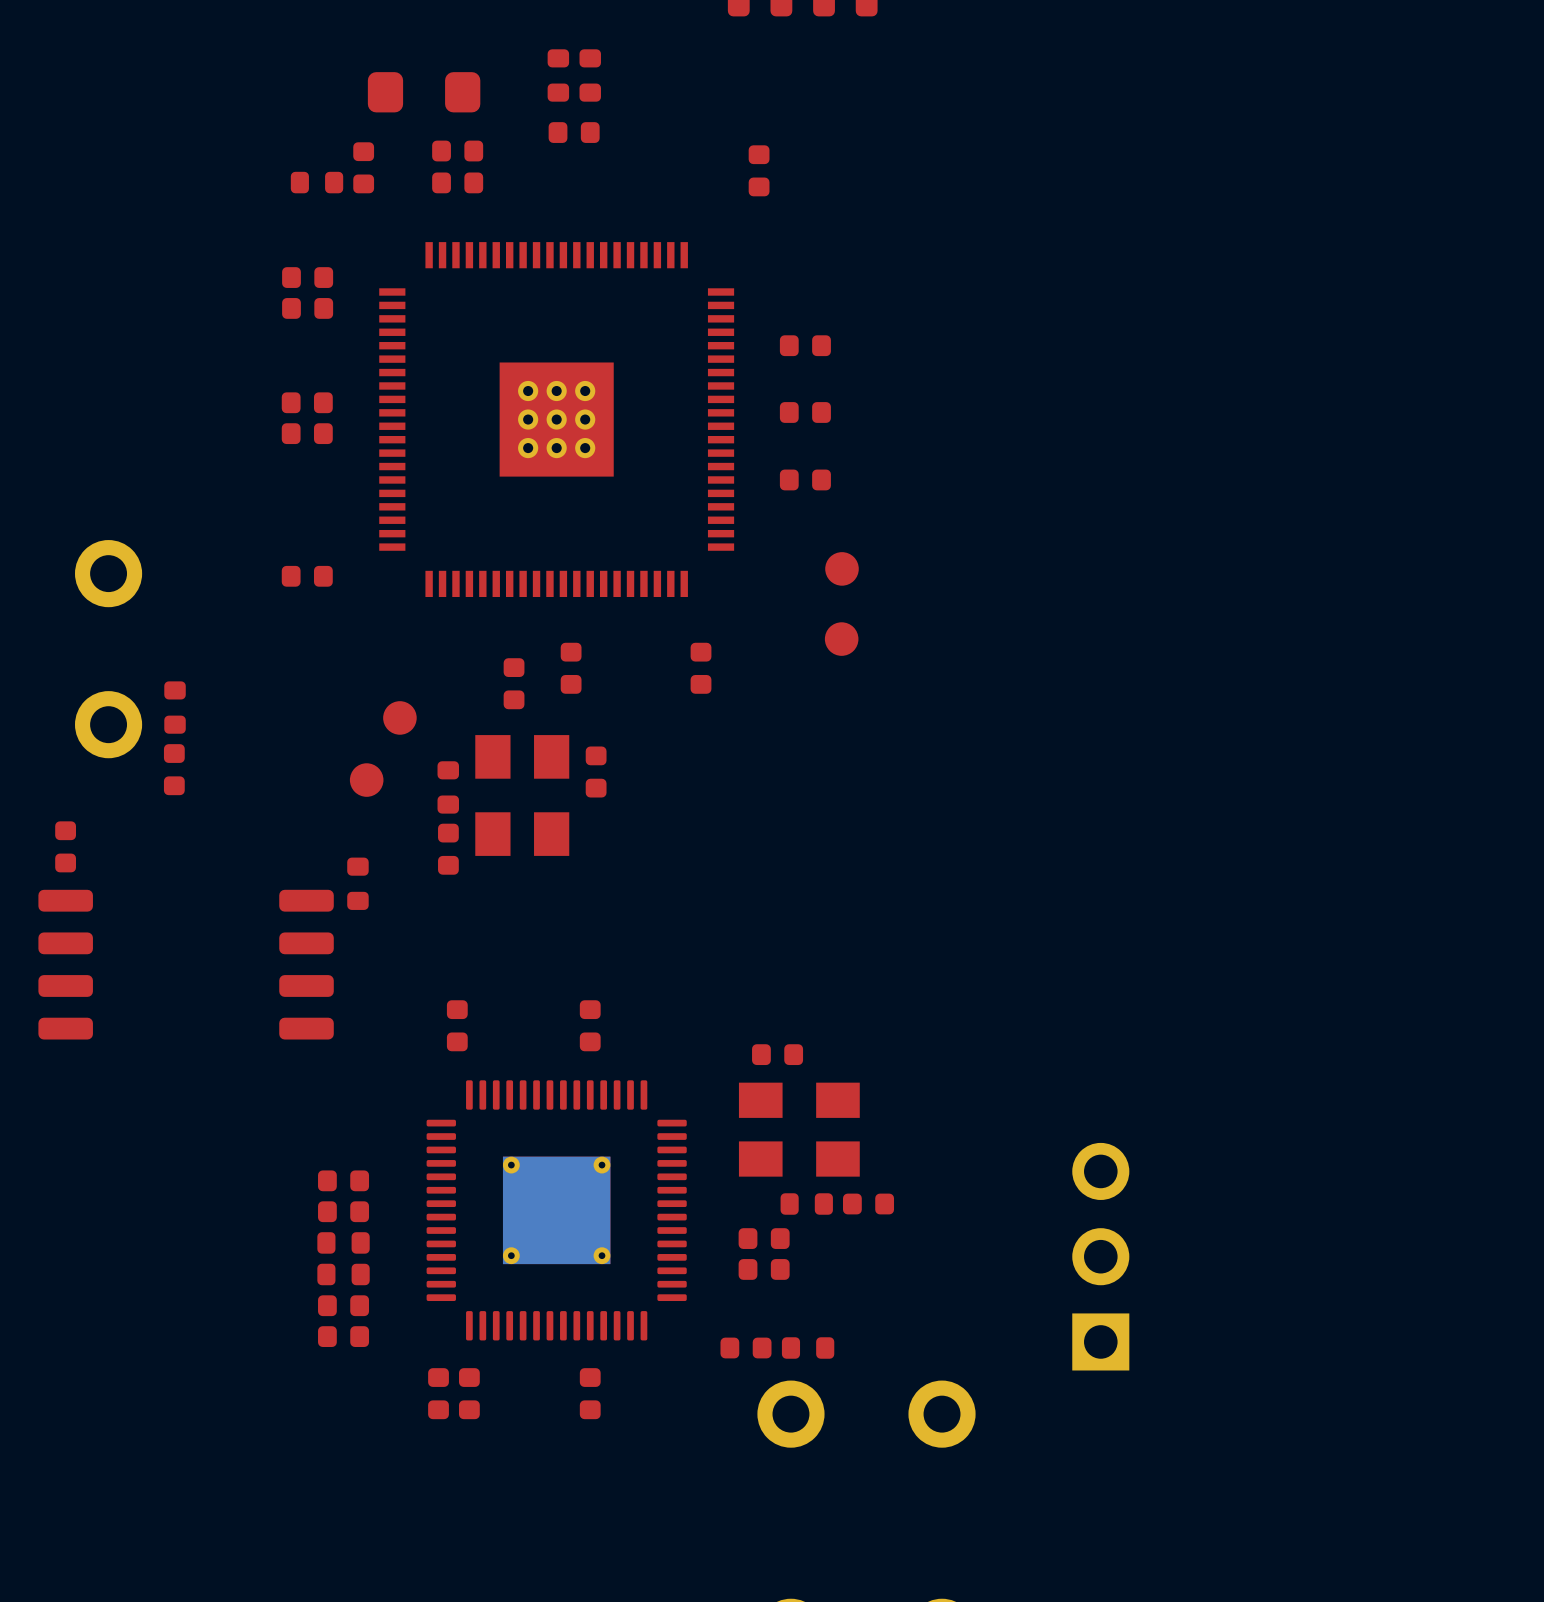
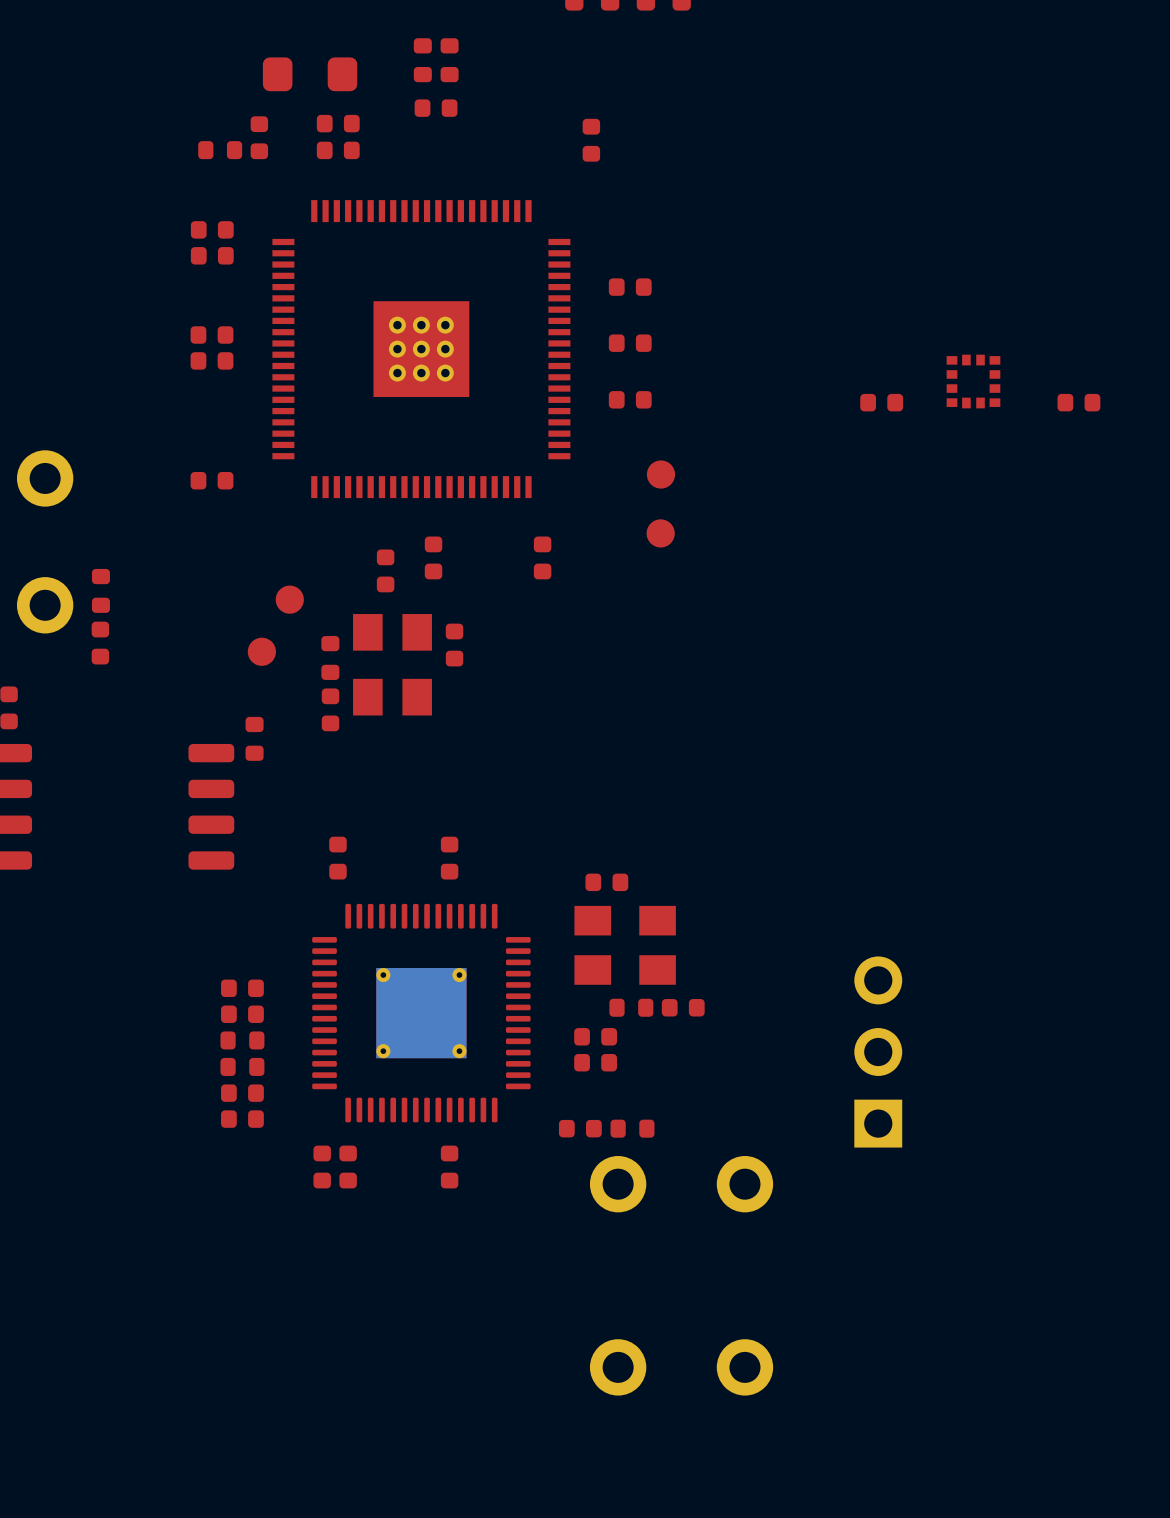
part: none -> (973, 381)
part: none -> (881, 402)
part: none -> (1078, 402)

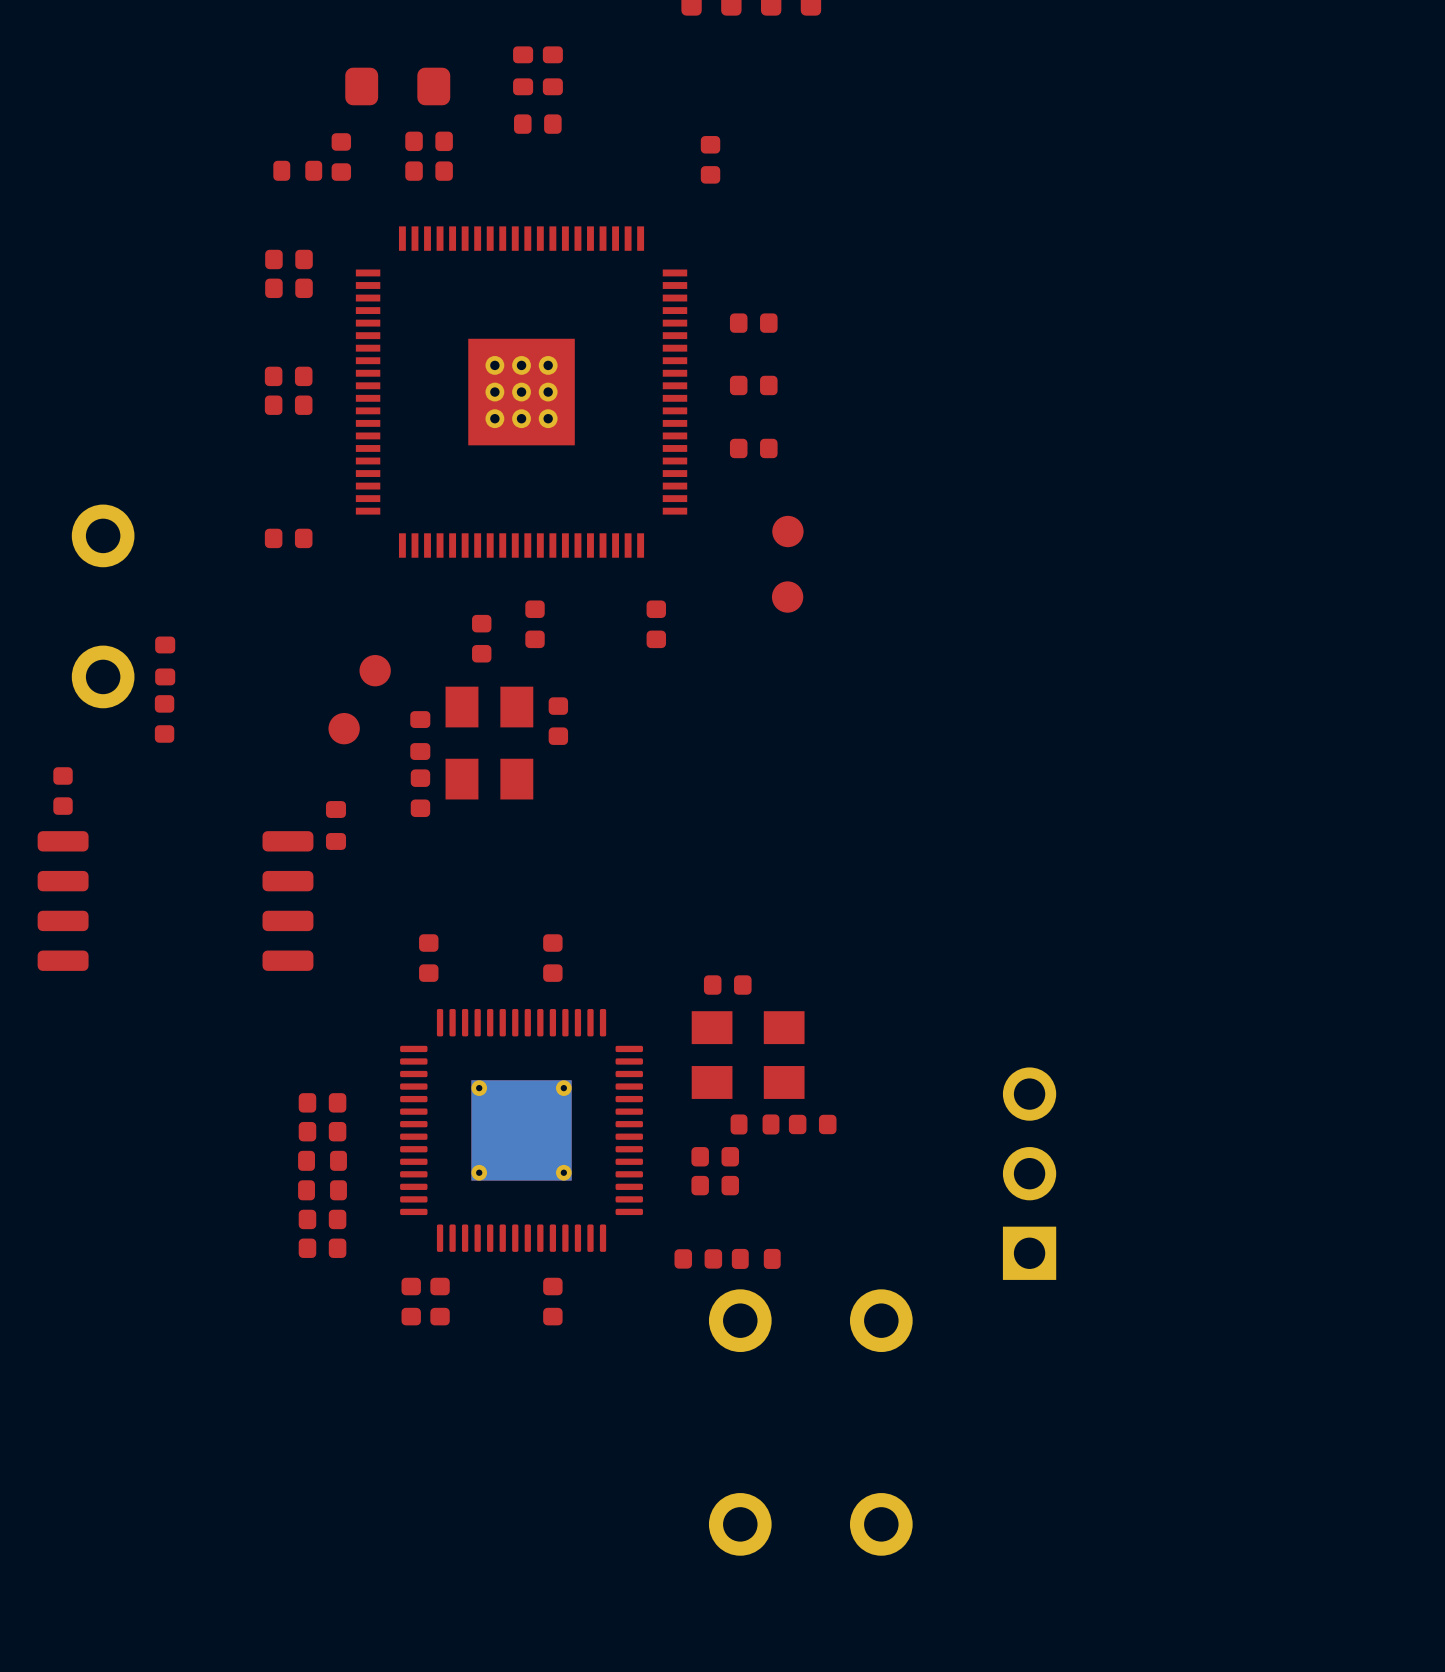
part: (973, 381) -> none
part: (881, 402) -> none
part: (1078, 402) -> none

